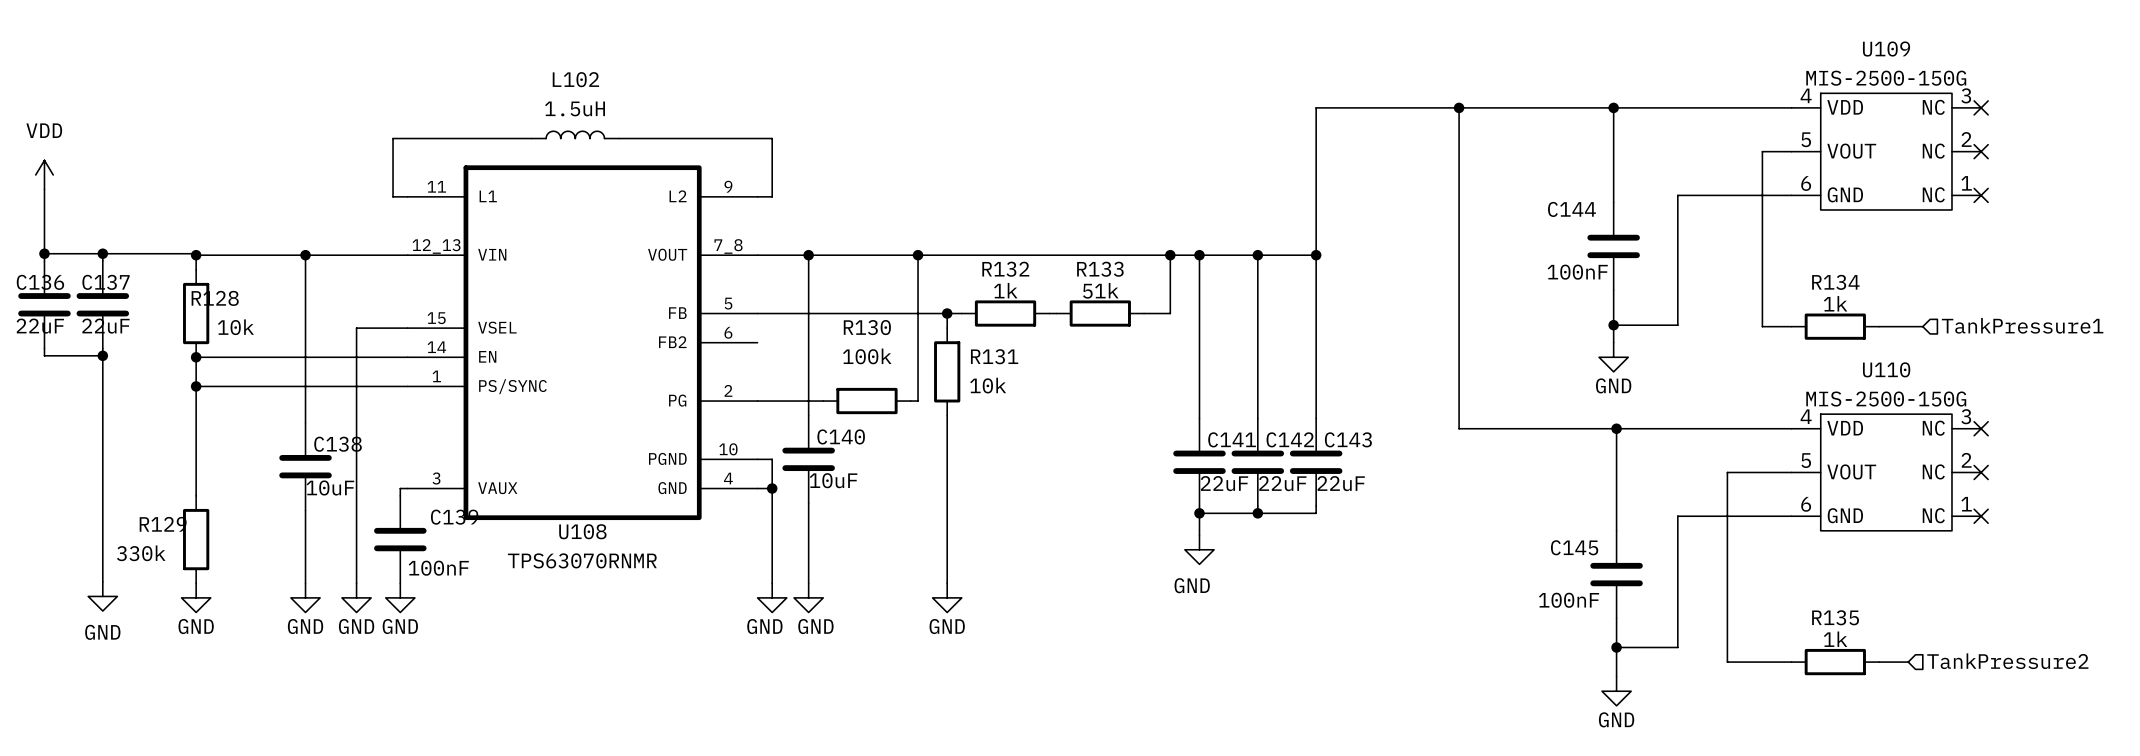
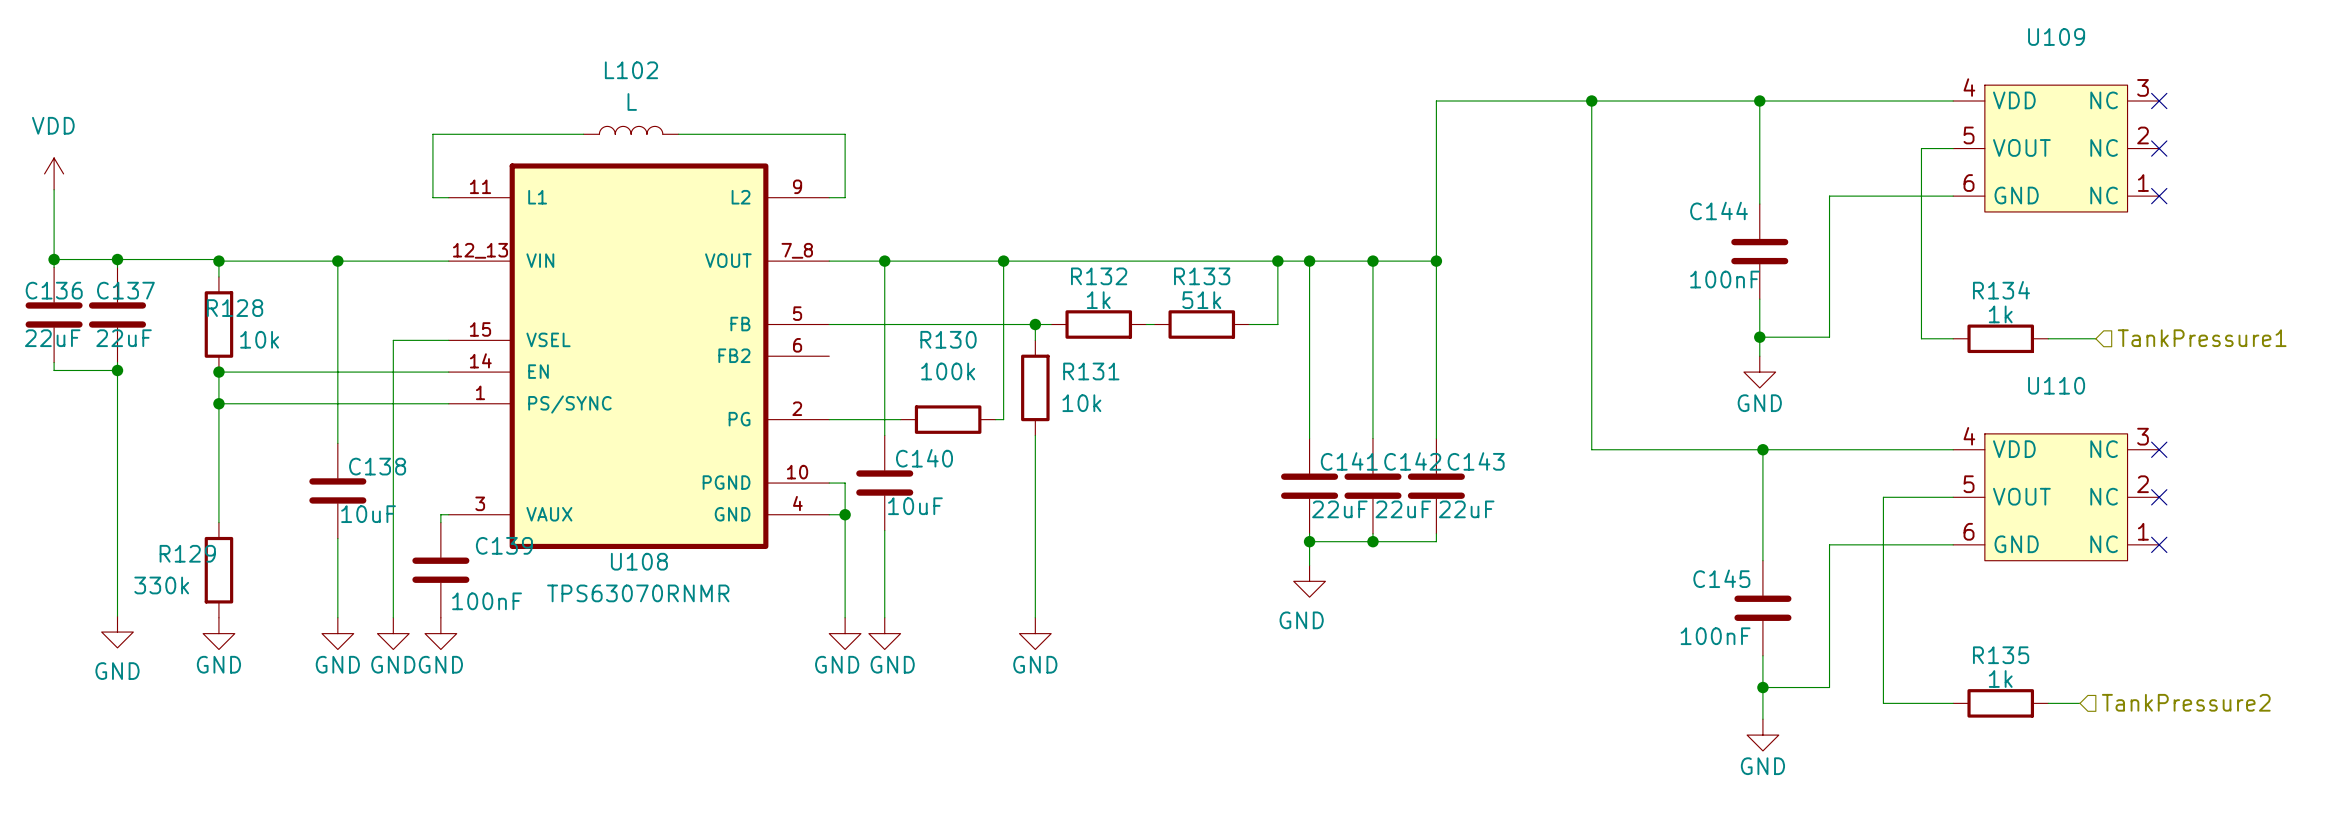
U109 value: MIS-2500-150G (1886, 78) -> none
L102 value: 1.5uH (575, 108) -> L (632, 101)
U110 value: MIS-2500-150G (1886, 399) -> none

